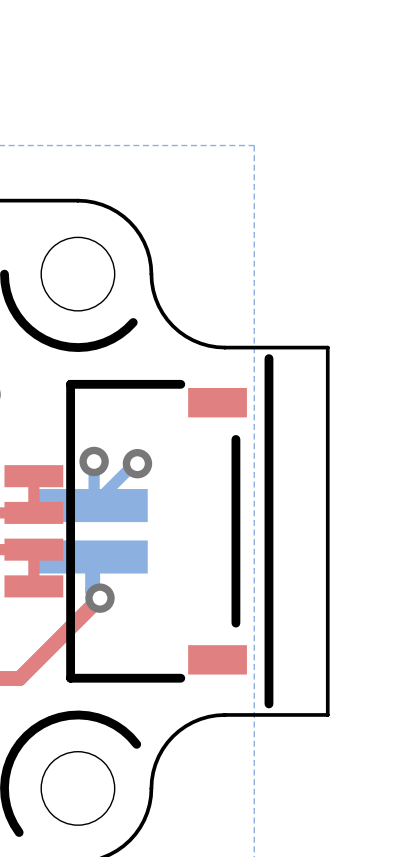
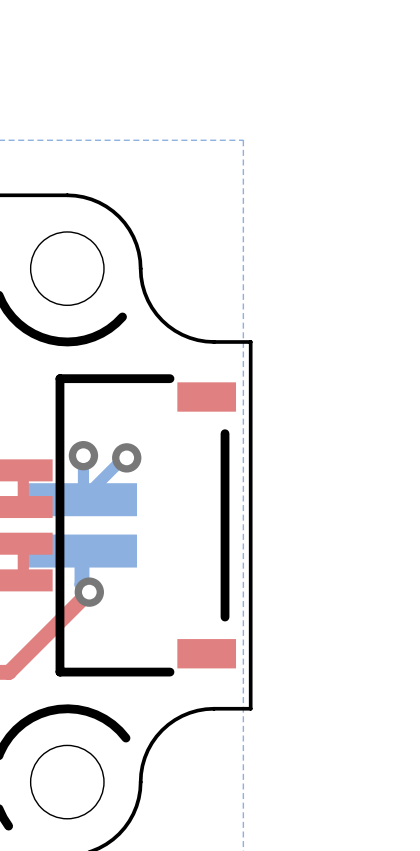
board edge: (261, 347) (327, 347) (327, 714) (261, 714) -> (250, 341) (250, 708)
line: (268, 358) (268, 703) -> none

